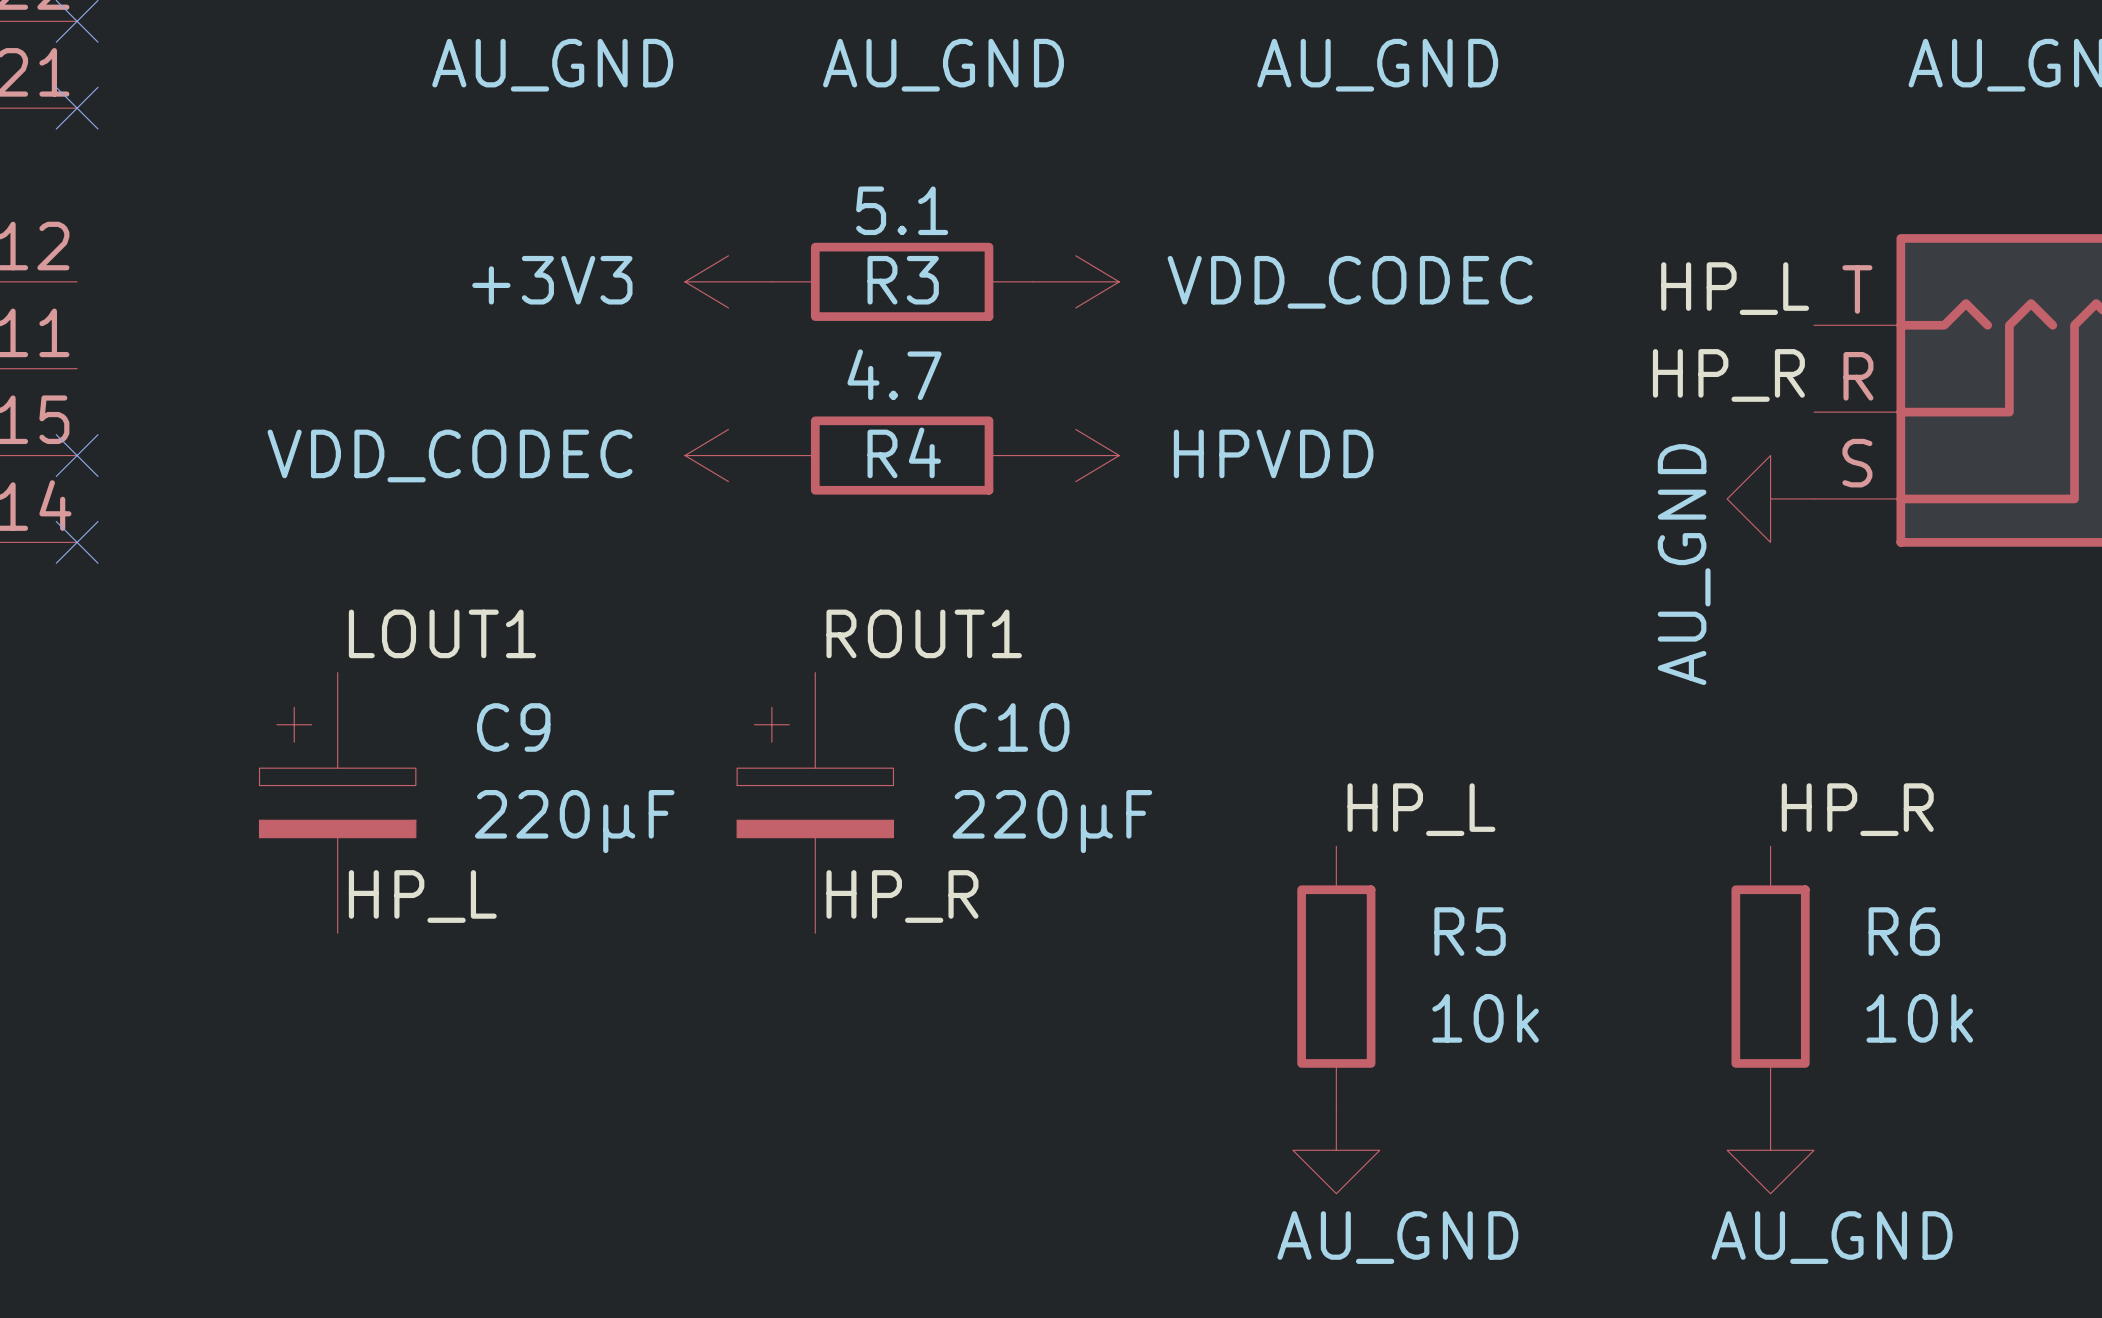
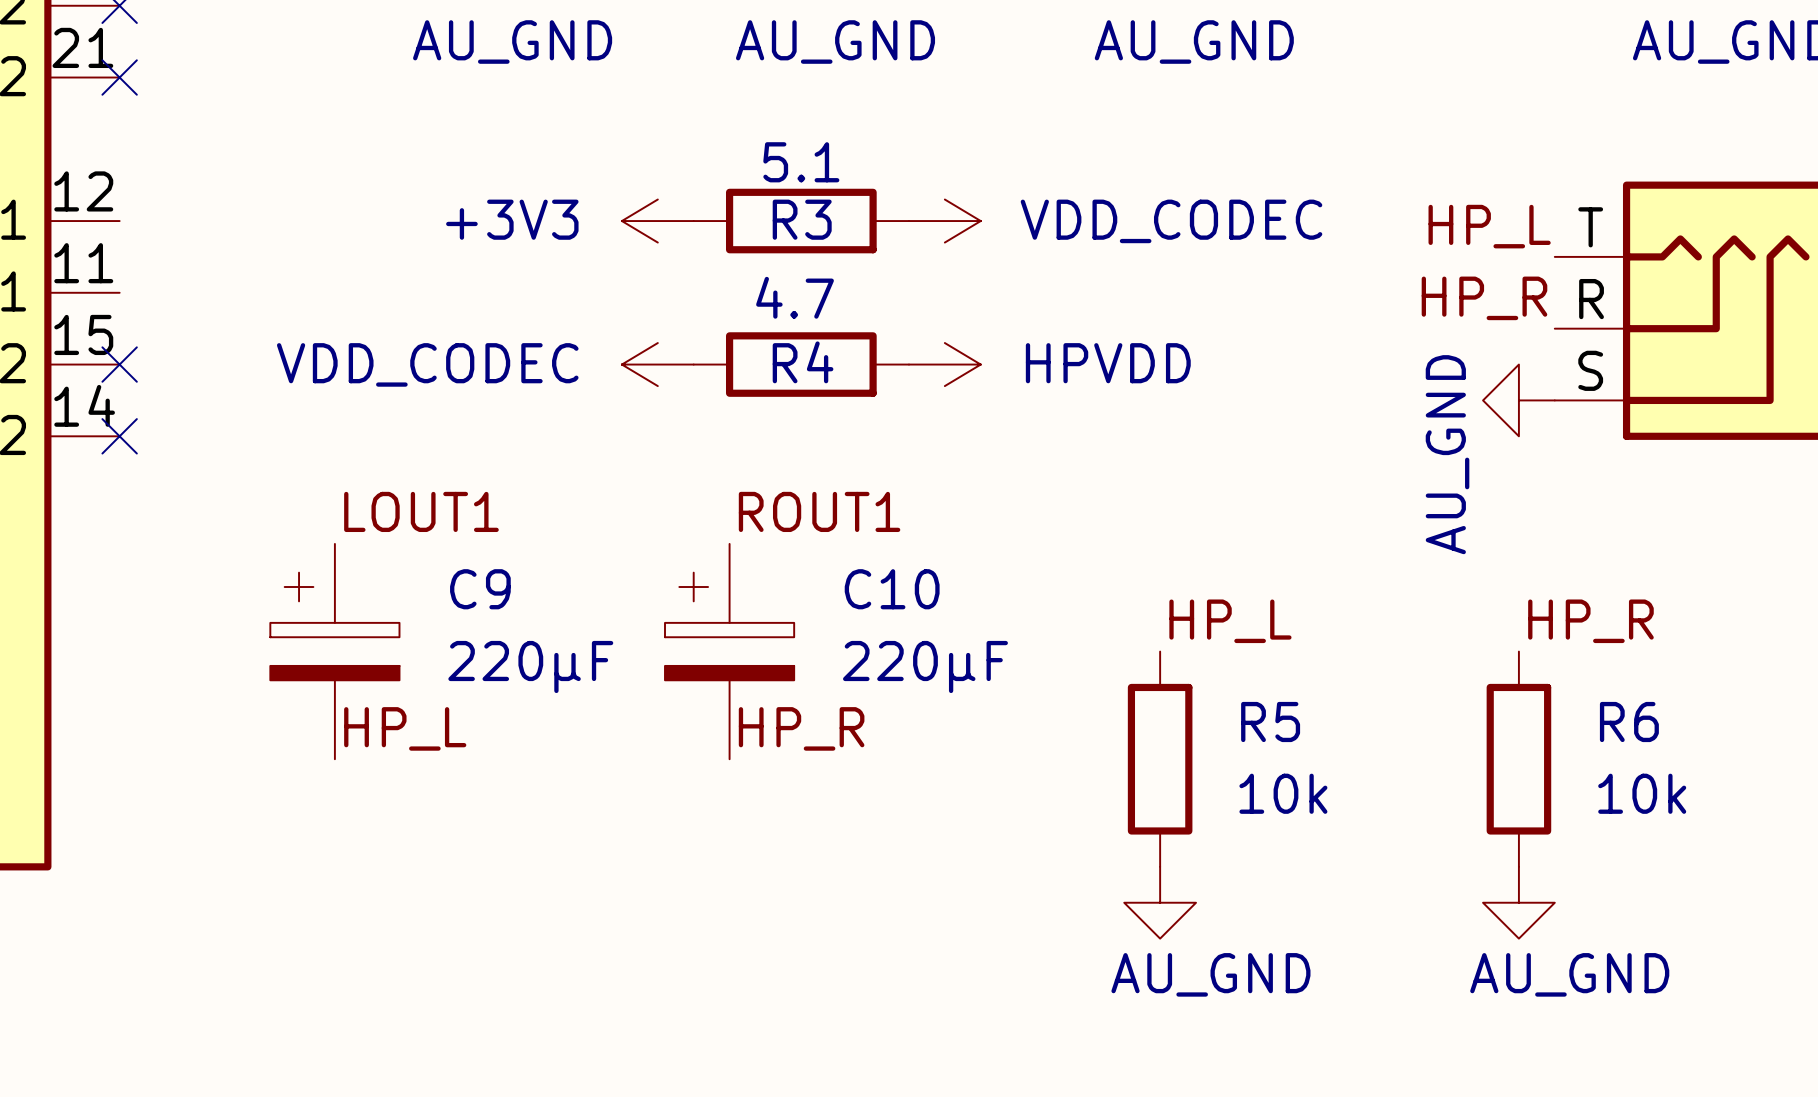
label position: HP_L (1421, 809) -> HP_L (1230, 621)
label position: HP_R (1857, 809) -> HP_R (1590, 621)
R5 position: (1336, 976) -> (1160, 759)
R6 position: (1770, 976) -> (1518, 759)
power symbol position: AU_GND (1336, 1150) -> AU_GND (1160, 902)
power symbol position: AU_GND (1770, 1150) -> AU_GND (1518, 902)

